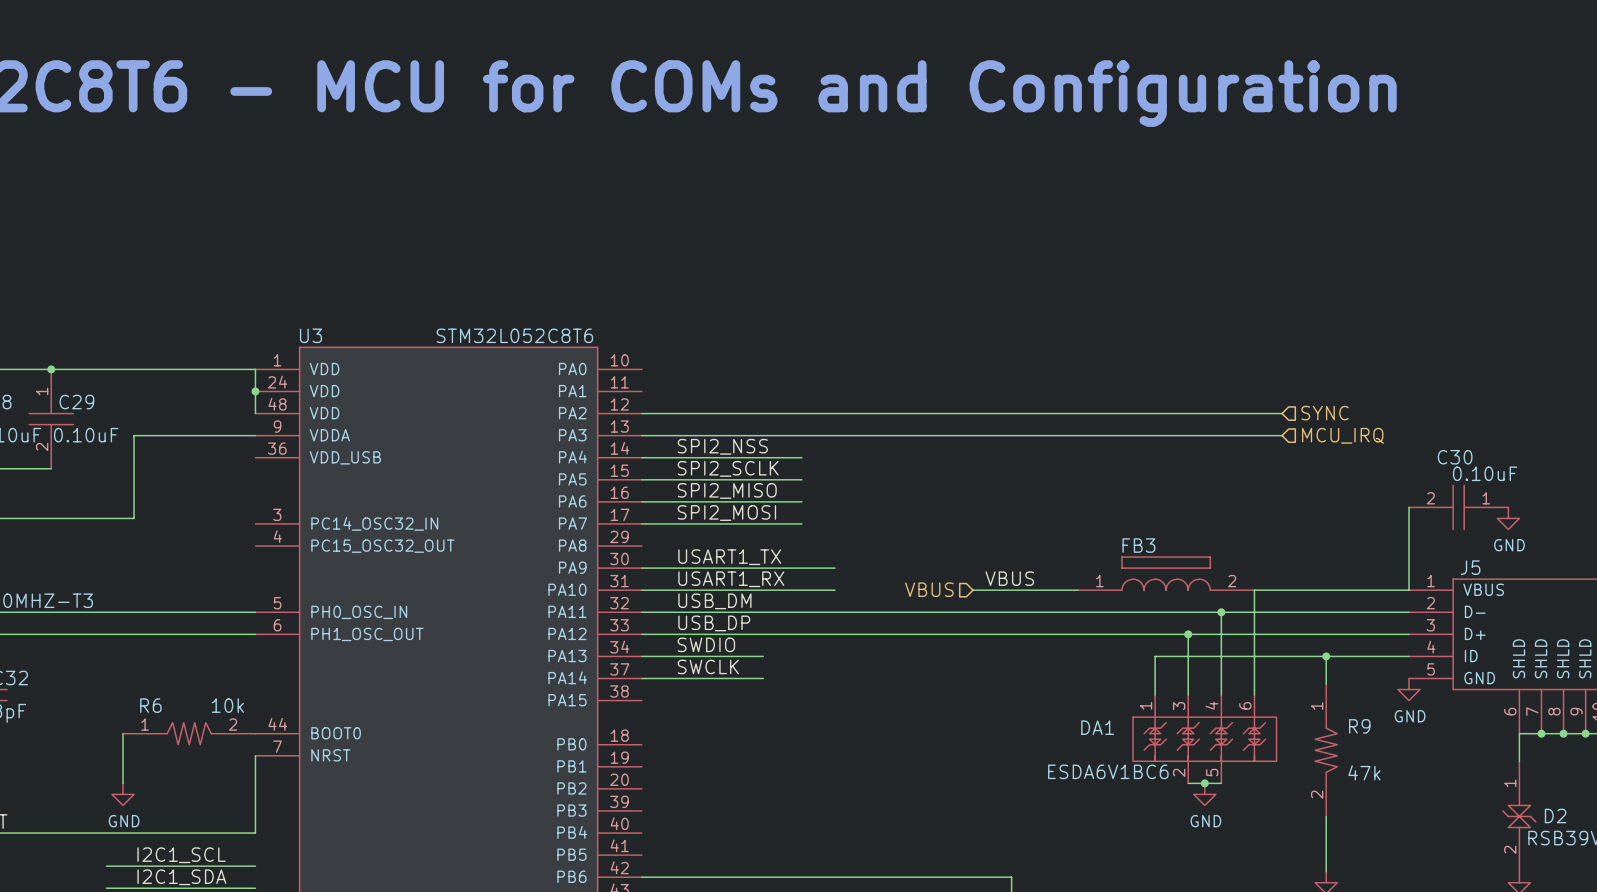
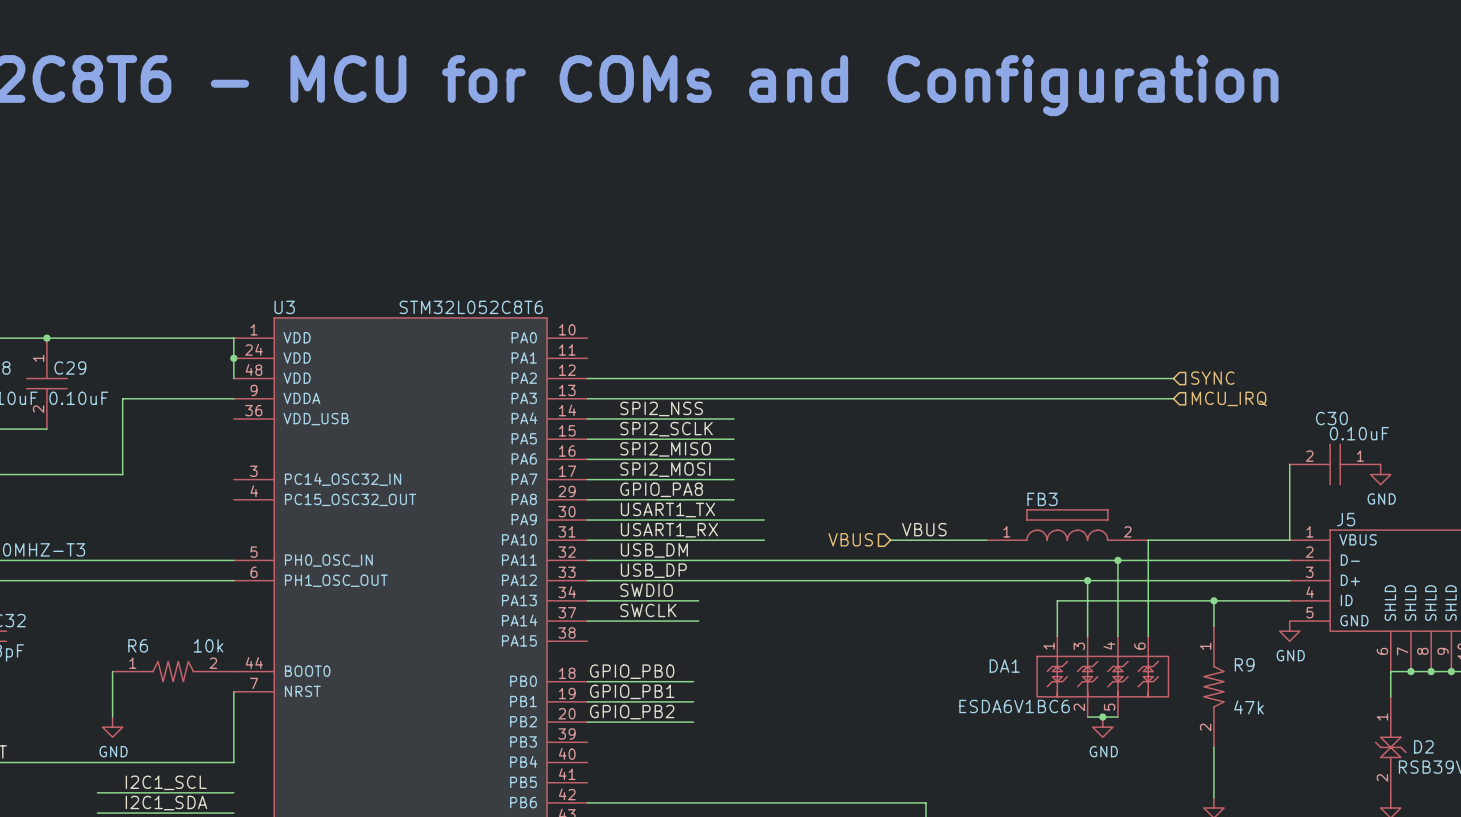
label: none -> GPIO_PA8 (661, 489)
wire: none -> (587, 499) (733, 499)
label: none -> GPIO_PB0 (632, 671)
wire: none -> (587, 681) (693, 681)
label: none -> GPIO_PB1 (632, 691)
wire: none -> (587, 701) (693, 701)
label: none -> GPIO_PB2 (632, 712)
wire: none -> (587, 722) (693, 722)

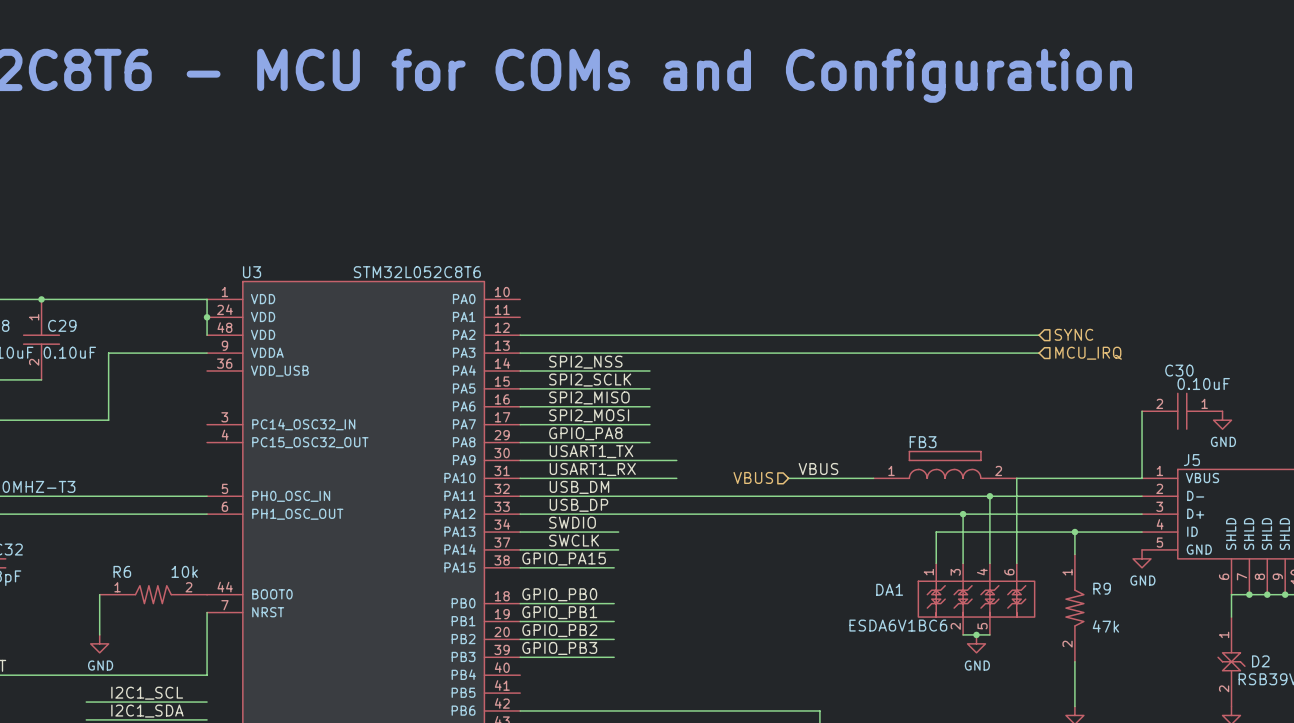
label: none -> GPIO_PA15 (564, 558)
wire: none -> (520, 567) (614, 567)
label: none -> GPIO_PB3 (559, 648)
wire: none -> (520, 657) (614, 657)

